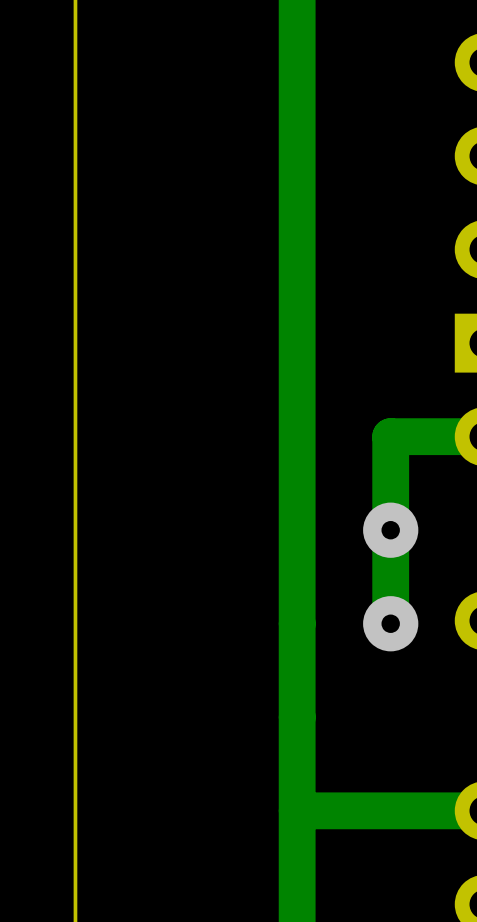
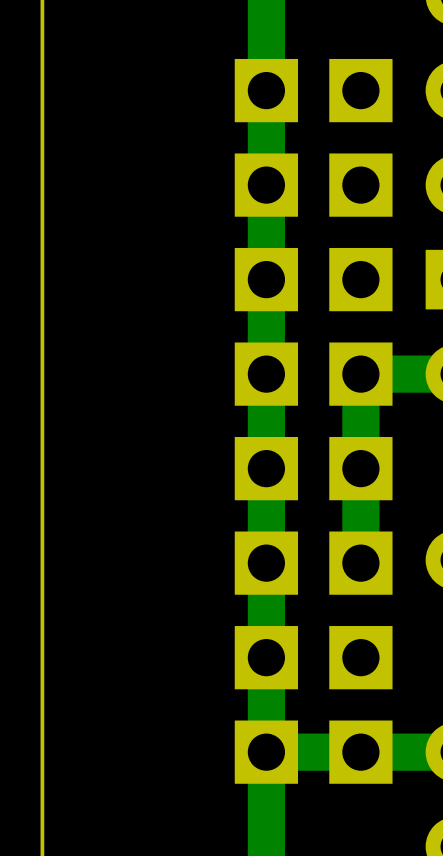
part: none -> (266, 90)
part: none -> (360, 90)
part: none -> (266, 185)
part: none -> (360, 185)
part: none -> (266, 279)
part: none -> (360, 279)
part: none -> (266, 374)
part: none -> (360, 374)
part: none -> (266, 468)
part: none -> (360, 468)
part: none -> (266, 563)
part: none -> (360, 563)
part: none -> (266, 657)
part: none -> (360, 657)
part: none -> (266, 752)
part: none -> (360, 752)

